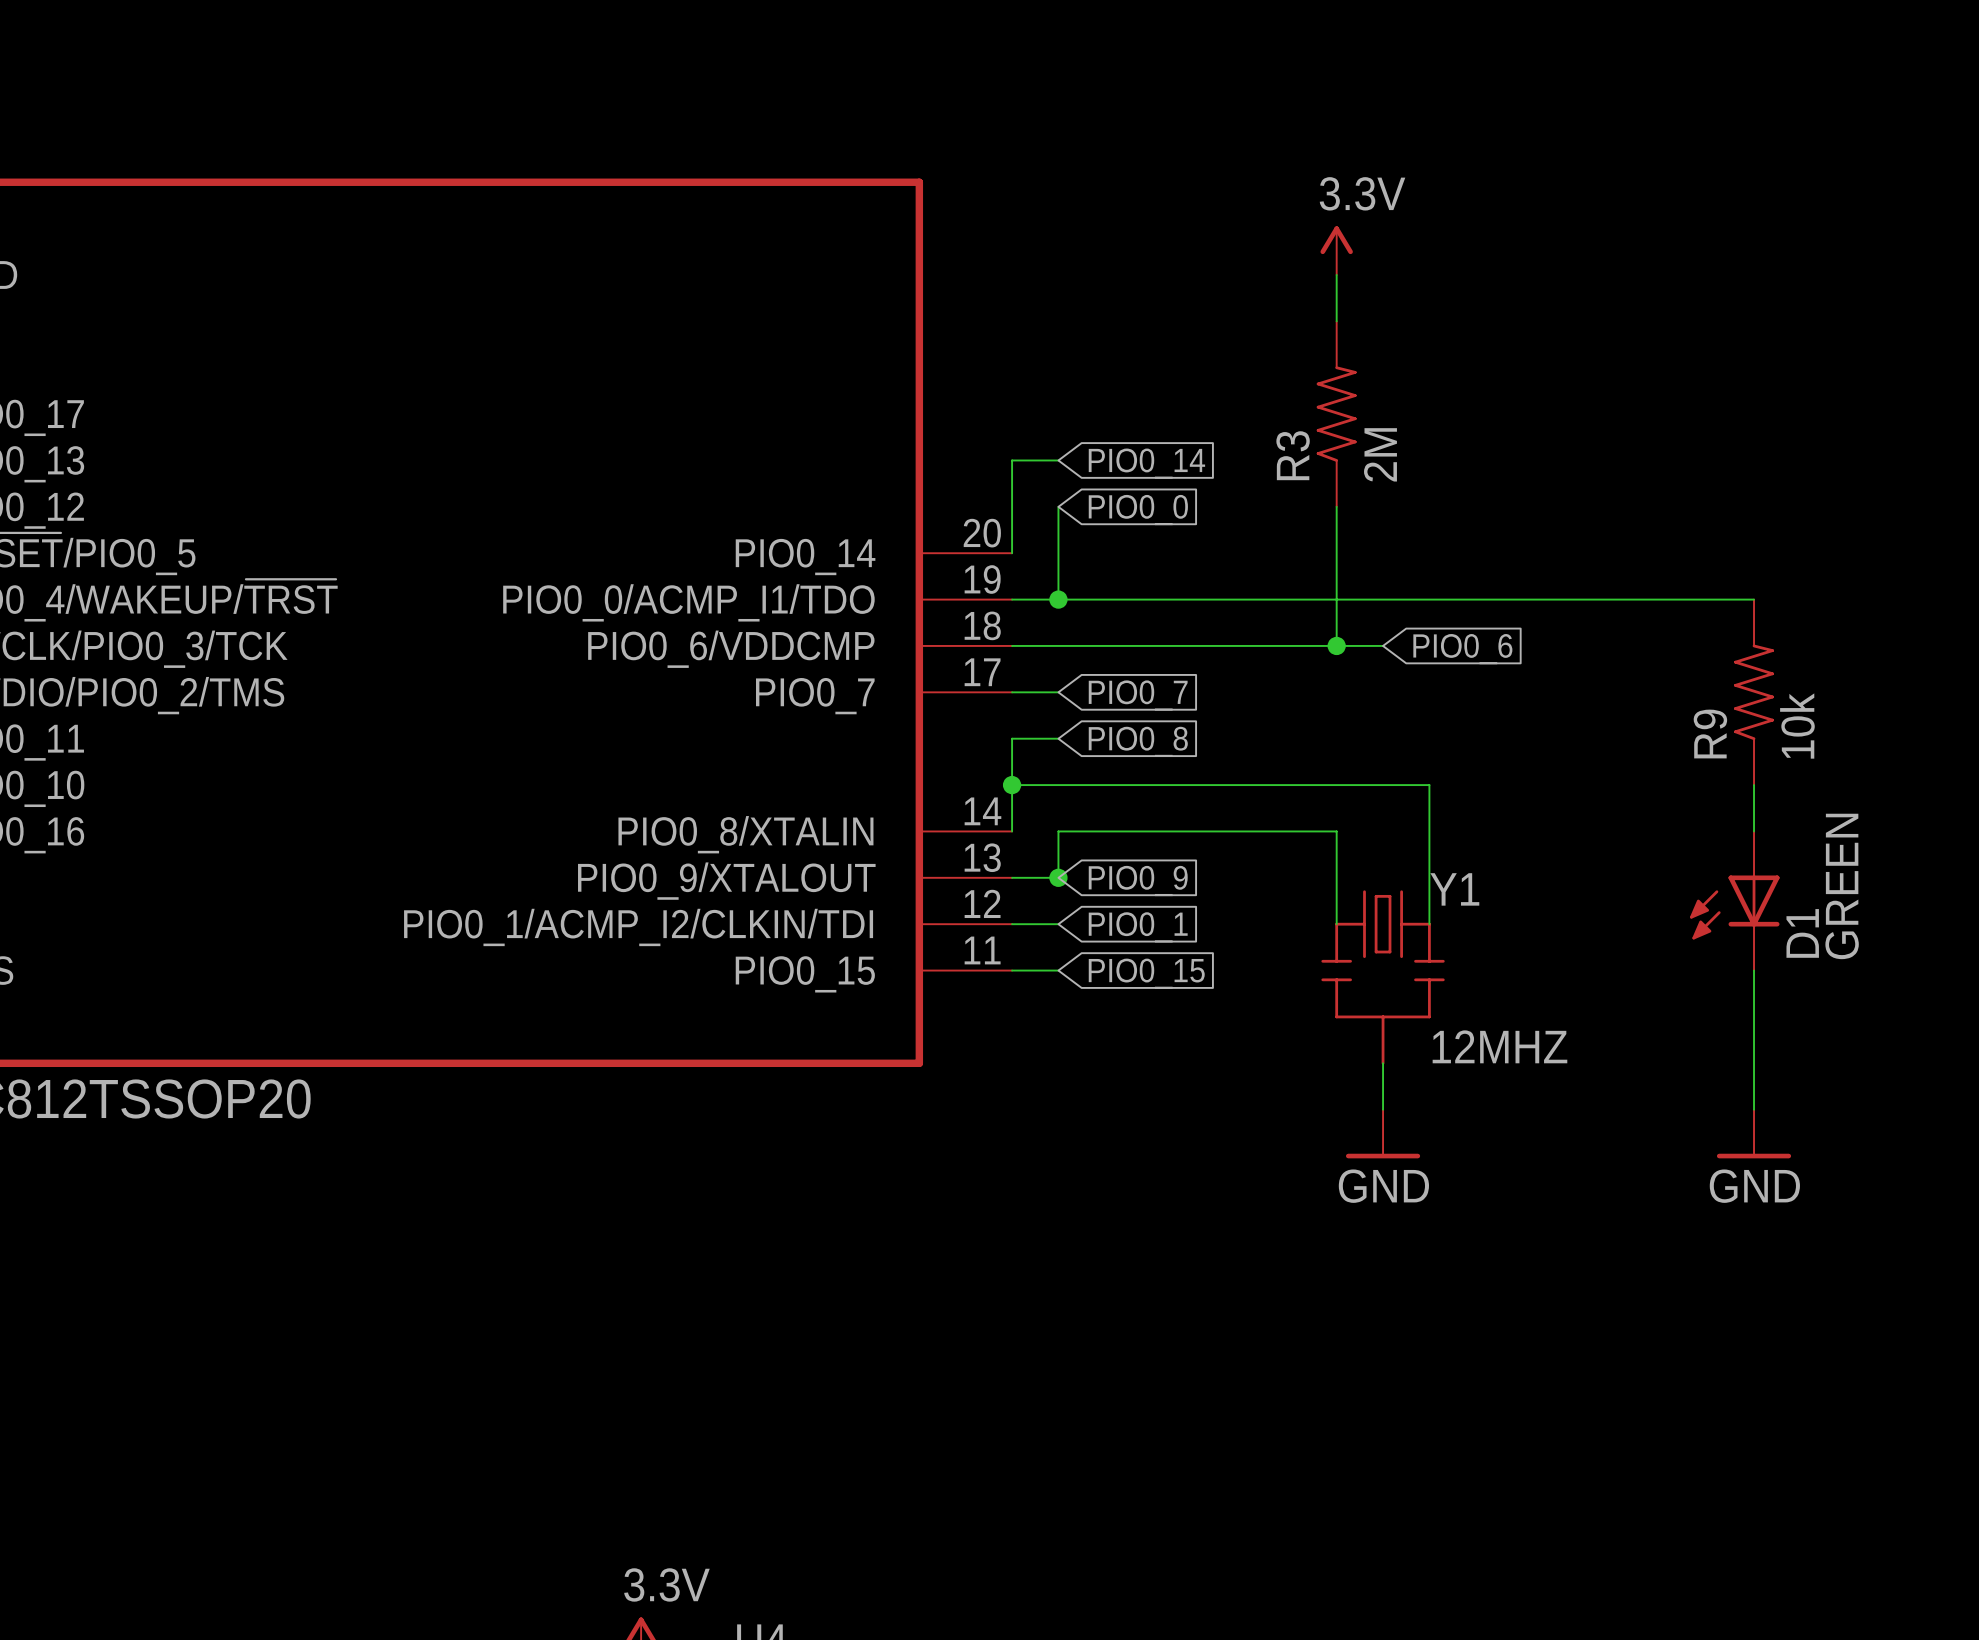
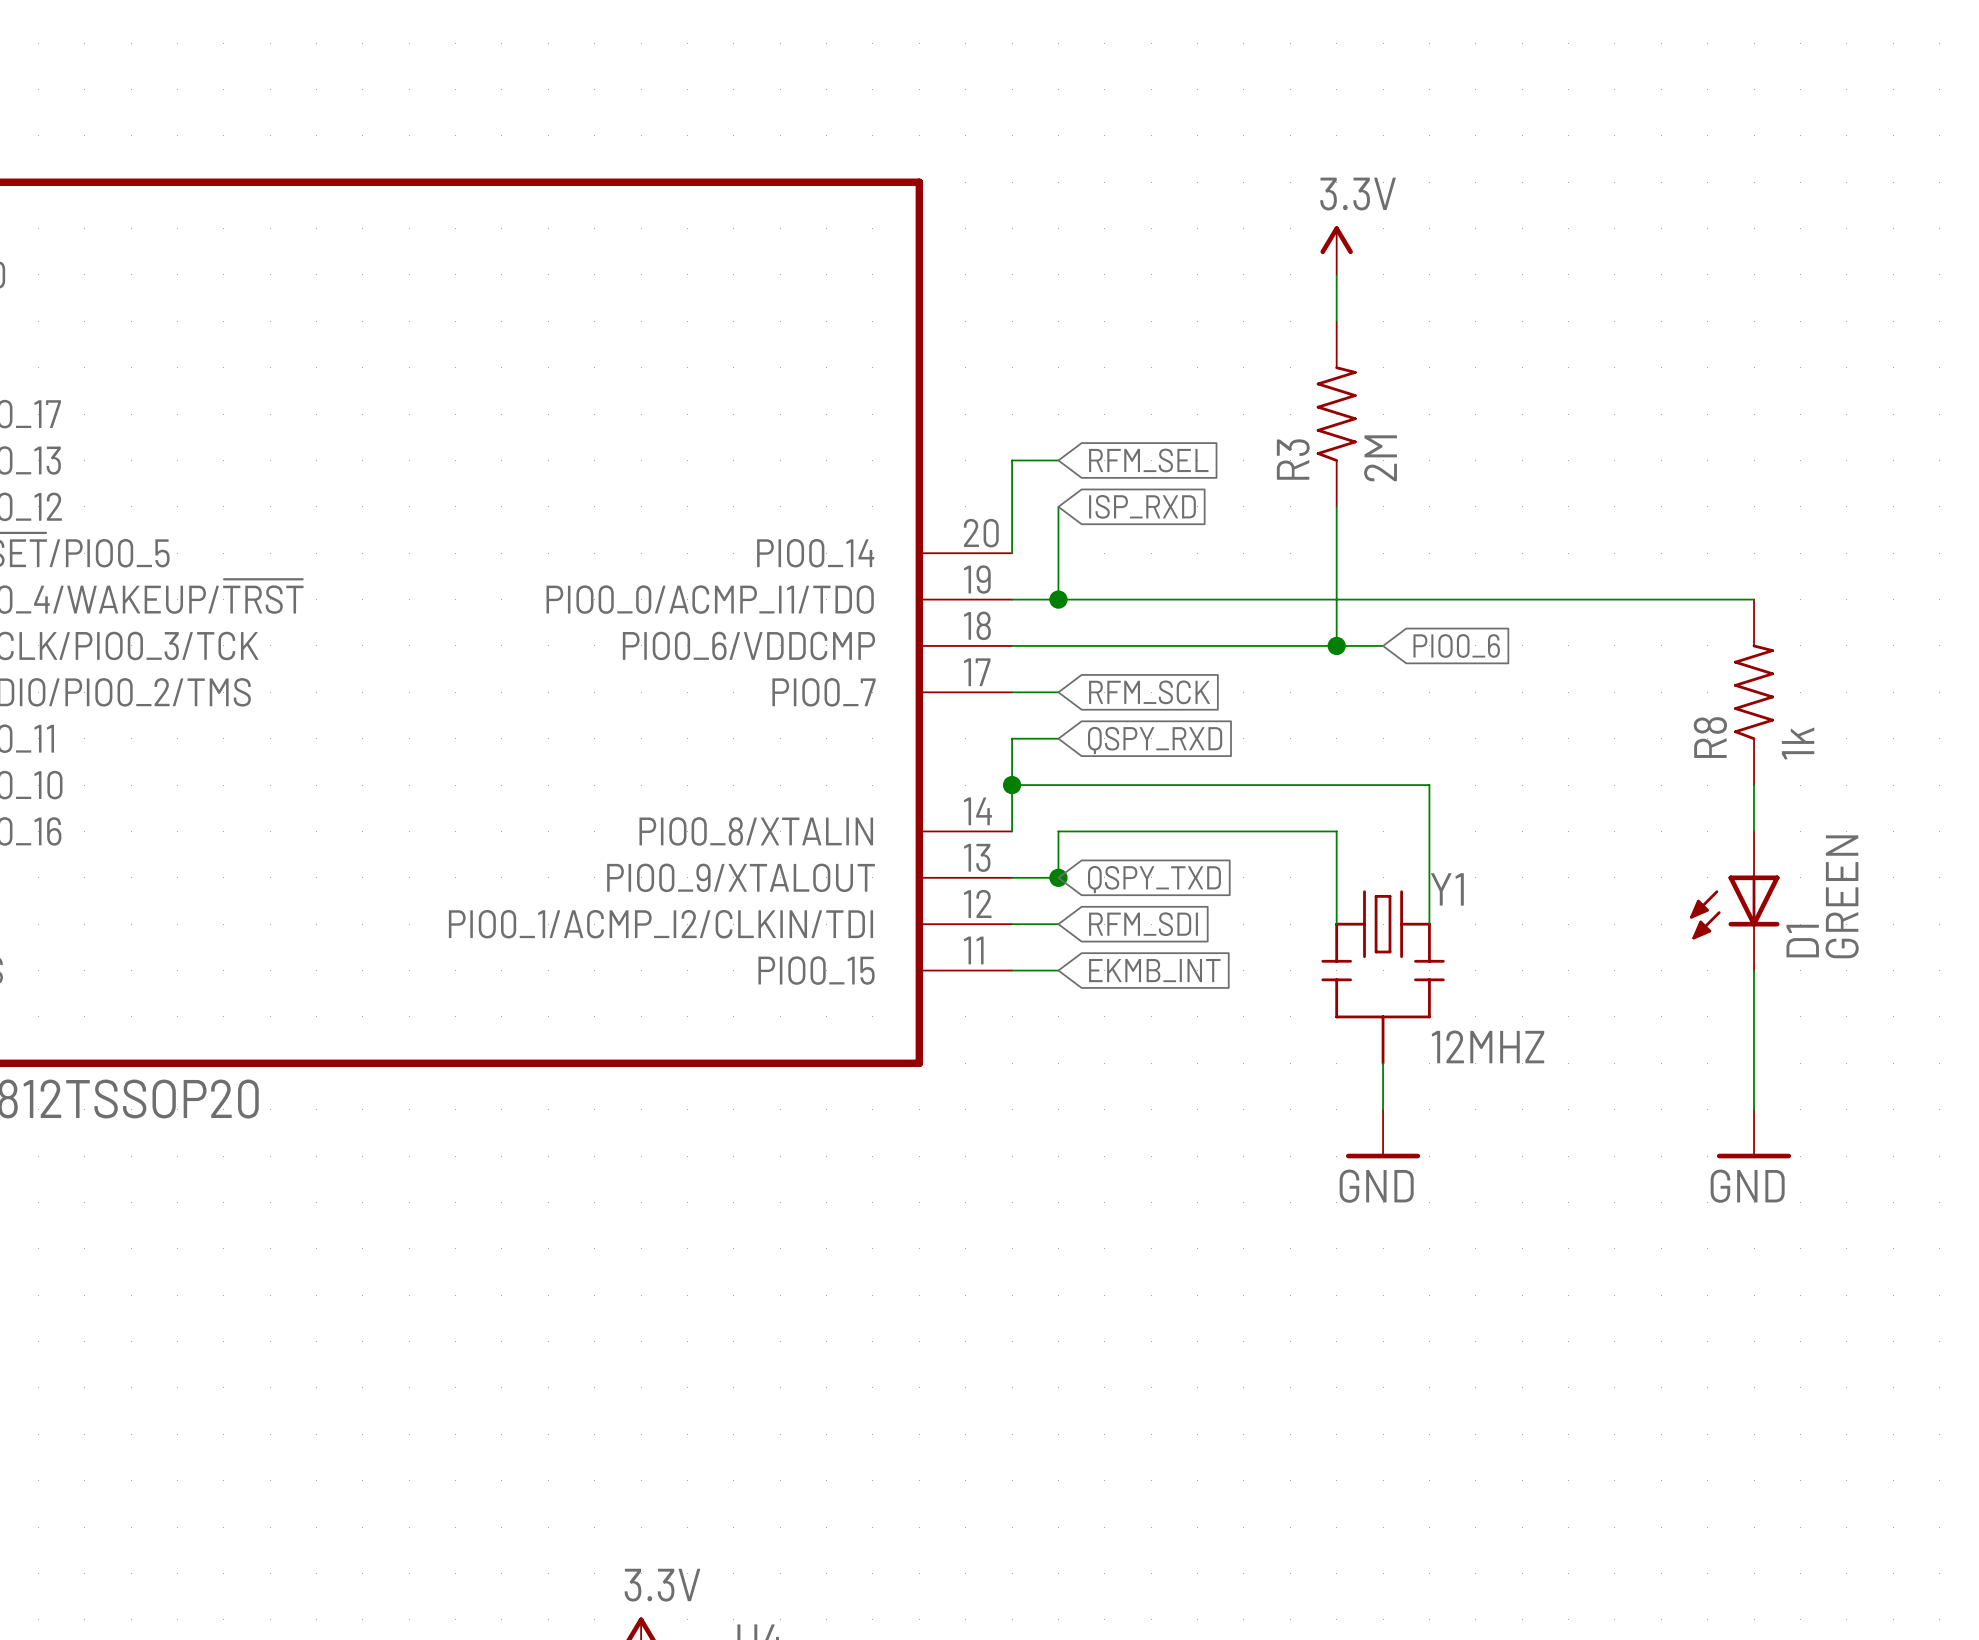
global label: PIO0_14 (1146, 463) -> RFM_SEL (1148, 460)
global label: PIO0_0 (1138, 510) -> ISP_RXD (1142, 506)
global label: PIO0_7 (1138, 695) -> RFM_SCK (1149, 692)
R9 value: 10k (1797, 726) -> 1k (1798, 743)
R9 name: R9 (1710, 734) -> R8 (1710, 737)
global label: PIO0_8 (1138, 741) -> QSPY_RXD (1155, 740)
global label: PIO0_9 (1138, 880) -> QSPY_TXD (1154, 879)
global label: PIO0_1 (1138, 927) -> RFM_SDI (1143, 924)
global label: PIO0_15 (1146, 973) -> EKMB_INT (1154, 970)

